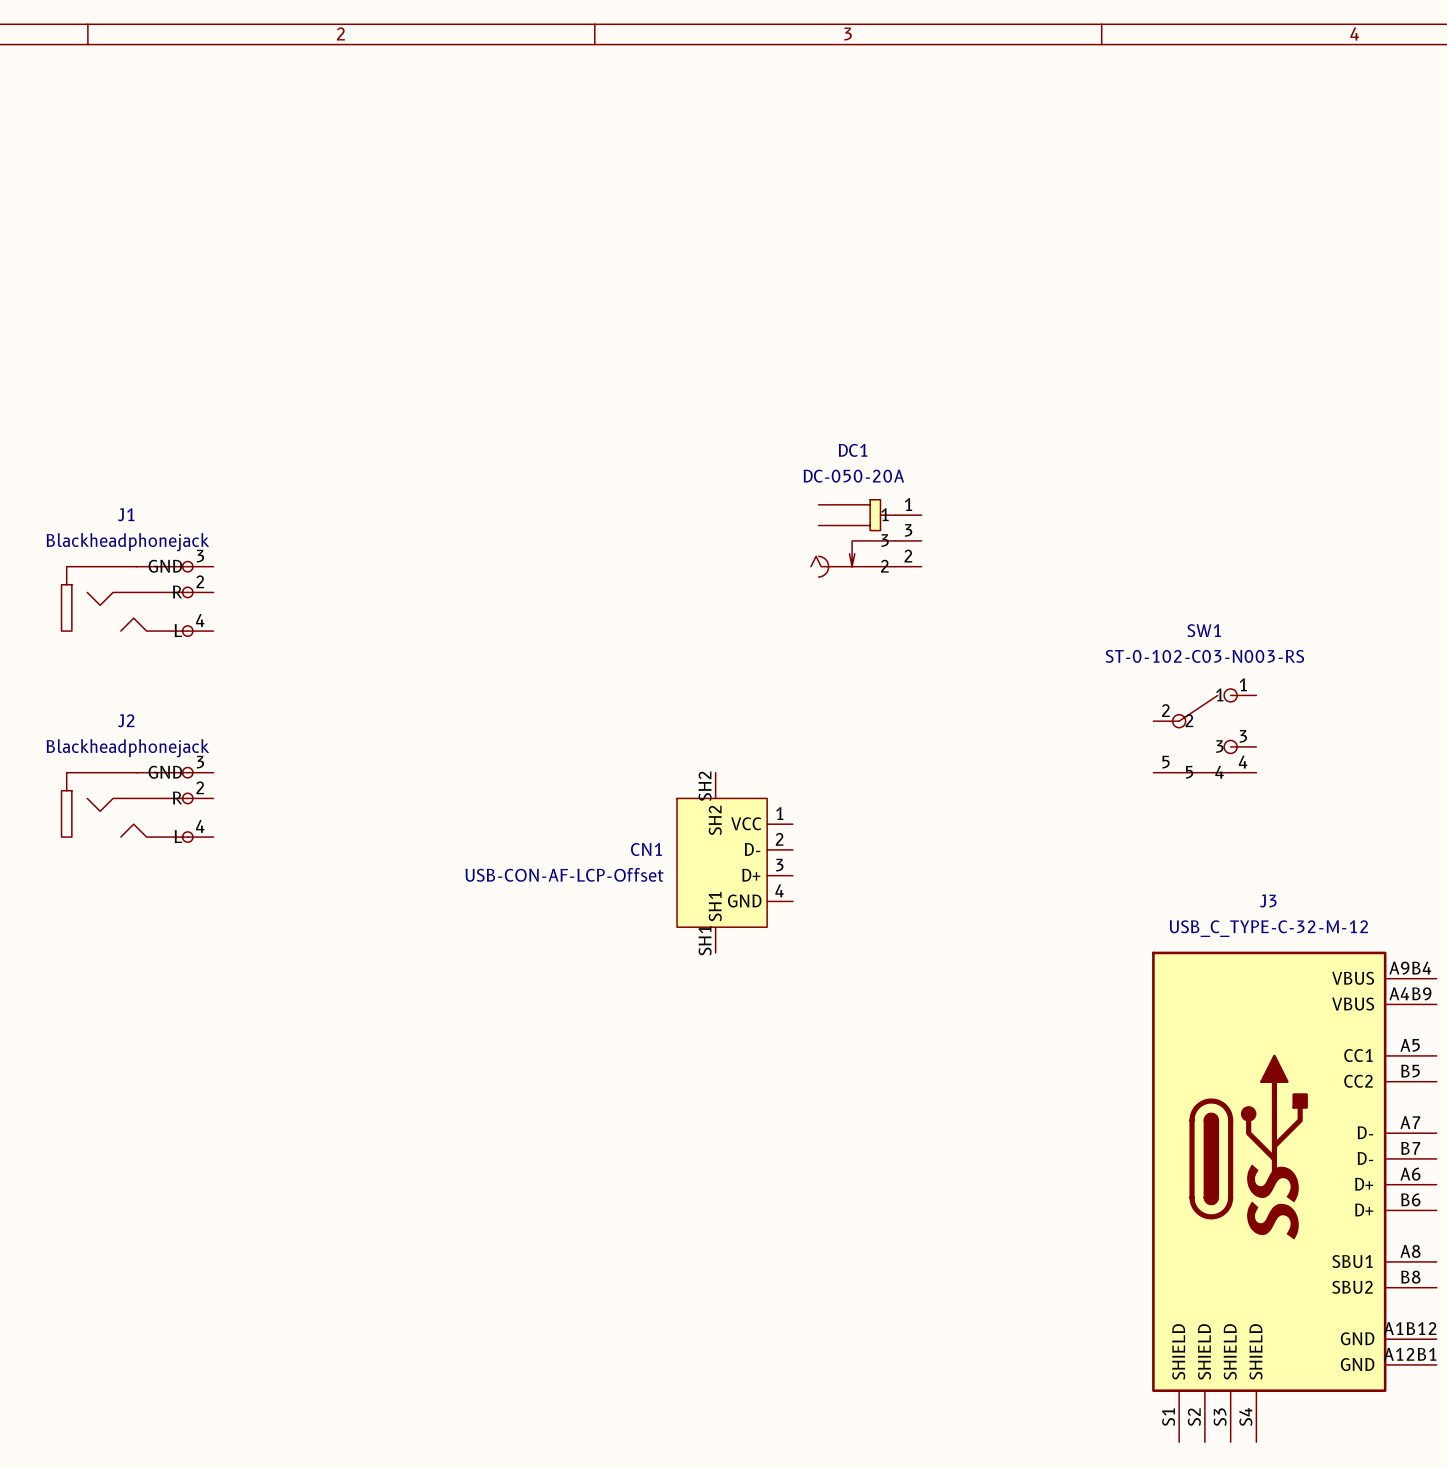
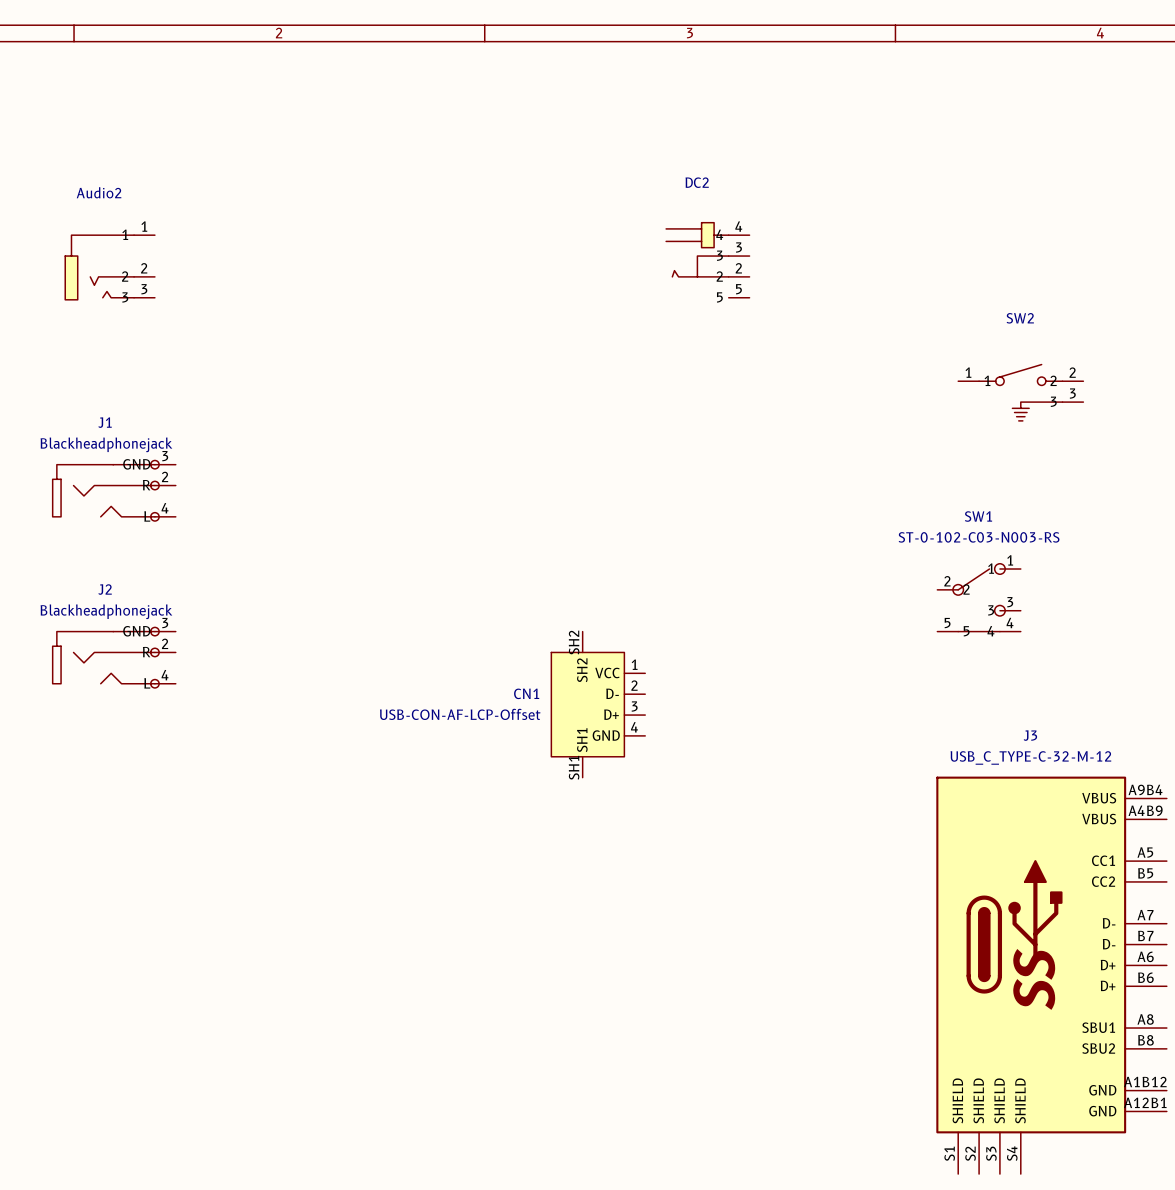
DC2: none -> (707, 260)
Audio2: none -> (110, 267)
SW2: none -> (1020, 392)
DC1: DC-050-20A (866, 538) -> none

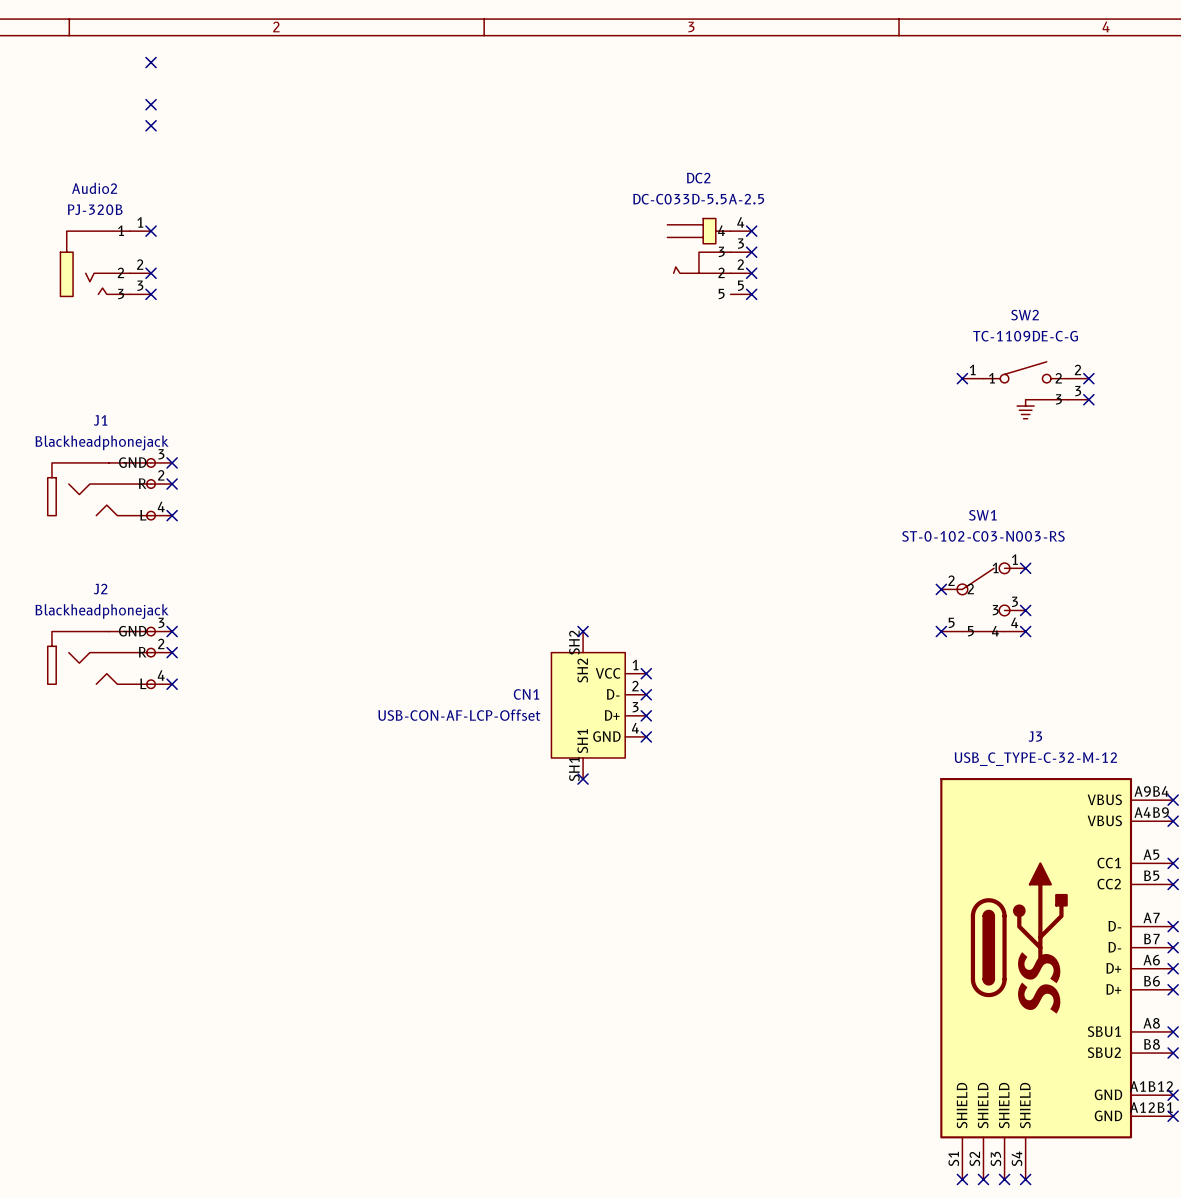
no-connect mark: none -> (151, 62)
no-connect mark: none -> (151, 104)
no-connect mark: none -> (151, 125)
DC2 value: none -> DC-C033D-5.5A-2.5 (698, 199)
Audio2 value: none -> PJ-320B (95, 209)
no-connect mark: none -> (151, 231)
no-connect mark: none -> (751, 231)
no-connect mark: none -> (751, 252)
no-connect mark: none -> (151, 273)
no-connect mark: none -> (751, 273)
no-connect mark: none -> (151, 294)
no-connect mark: none -> (751, 294)
SW2 value: none -> TC-1109DE-C-G (1025, 336)
no-connect mark: none -> (962, 378)
no-connect mark: none -> (1088, 378)
no-connect mark: none -> (1088, 399)
no-connect mark: none -> (172, 462)
no-connect mark: none -> (172, 484)
no-connect mark: none -> (172, 515)
no-connect mark: none -> (1025, 568)
no-connect mark: none -> (941, 589)
no-connect mark: none -> (1025, 610)
no-connect mark: none -> (172, 631)
no-connect mark: none -> (583, 631)
no-connect mark: none -> (941, 631)
no-connect mark: none -> (1025, 631)
no-connect mark: none -> (172, 652)
no-connect mark: none -> (646, 673)
no-connect mark: none -> (172, 684)
no-connect mark: none -> (646, 694)
no-connect mark: none -> (646, 715)
no-connect mark: none -> (646, 736)
no-connect mark: none -> (583, 779)
no-connect mark: none -> (1173, 800)
no-connect mark: none -> (1173, 821)
no-connect mark: none -> (1173, 863)
no-connect mark: none -> (1173, 884)
no-connect mark: none -> (1173, 926)
no-connect mark: none -> (1173, 947)
no-connect mark: none -> (1173, 968)
no-connect mark: none -> (1173, 989)
no-connect mark: none -> (1173, 1031)
no-connect mark: none -> (1173, 1053)
no-connect mark: none -> (1173, 1095)
no-connect mark: none -> (1173, 1116)
no-connect mark: none -> (962, 1179)
no-connect mark: none -> (983, 1179)
no-connect mark: none -> (1004, 1179)
no-connect mark: none -> (1025, 1179)

